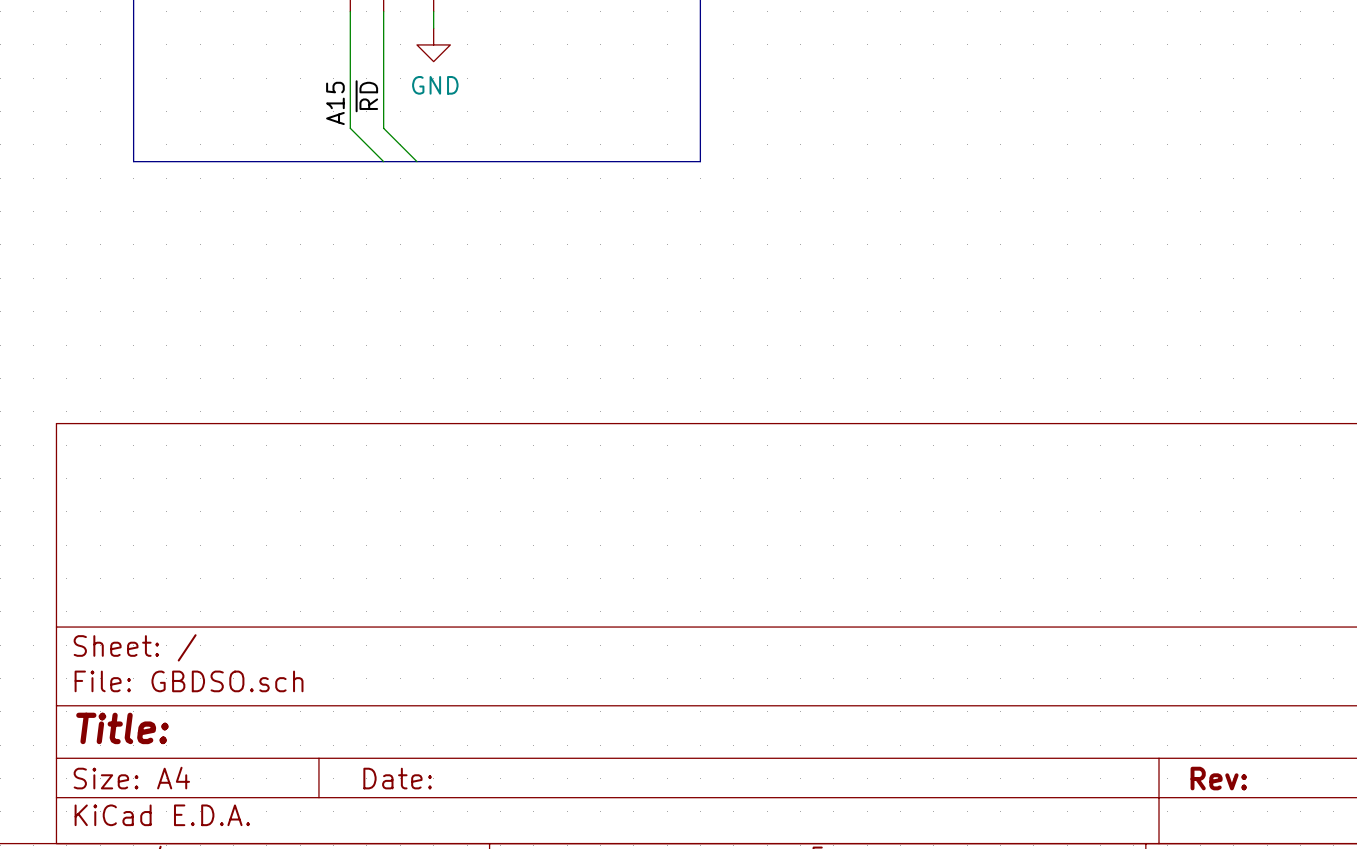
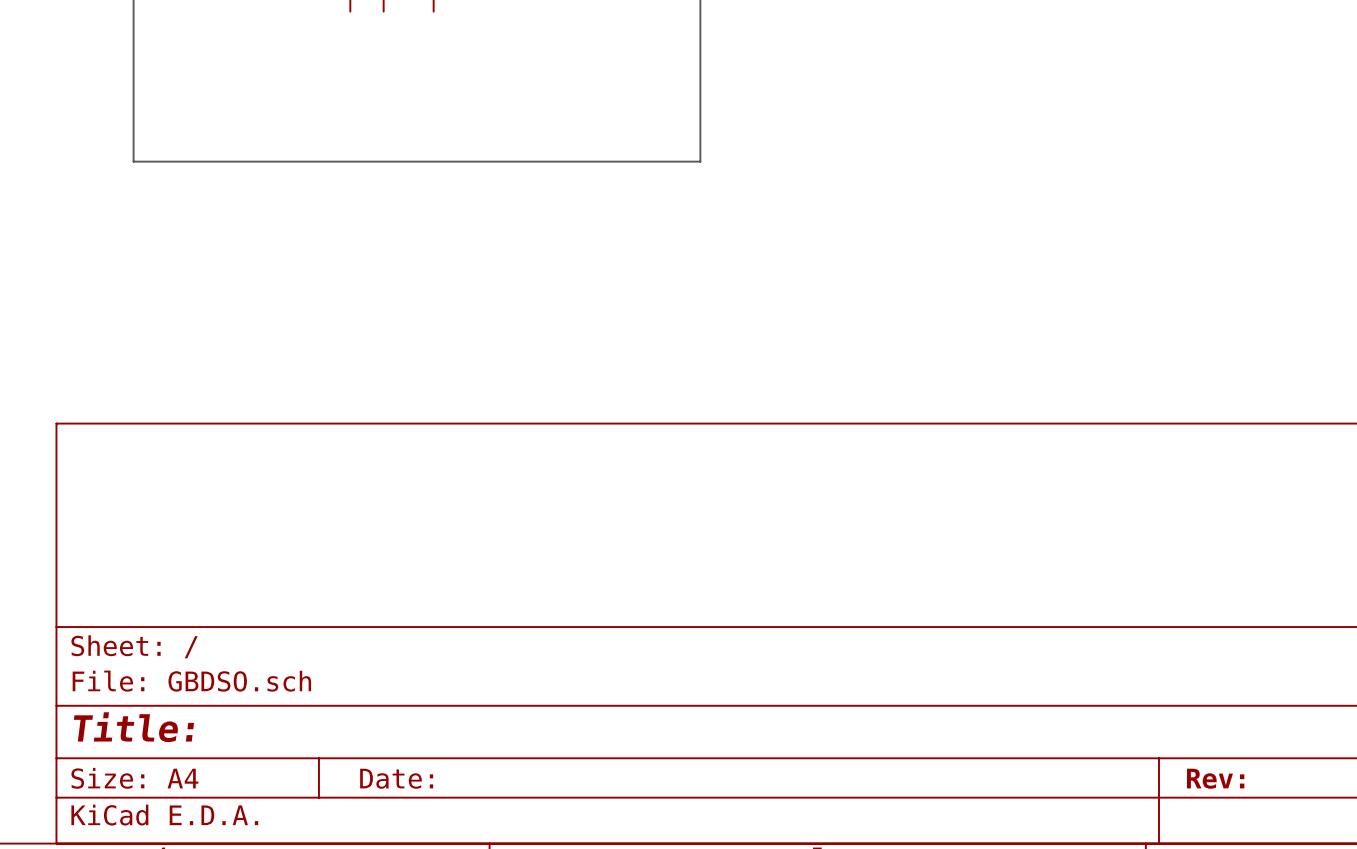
wire: (350, 11) (350, 128) (383, 161) -> none
wire: (383, 11) (383, 128) (416, 161) -> none
wire: (433, 11) (433, 28) -> none
power symbol: GND (433, 44) -> none
label: ~{RD} (366, 96) -> none
label: A15 (335, 103) -> none

